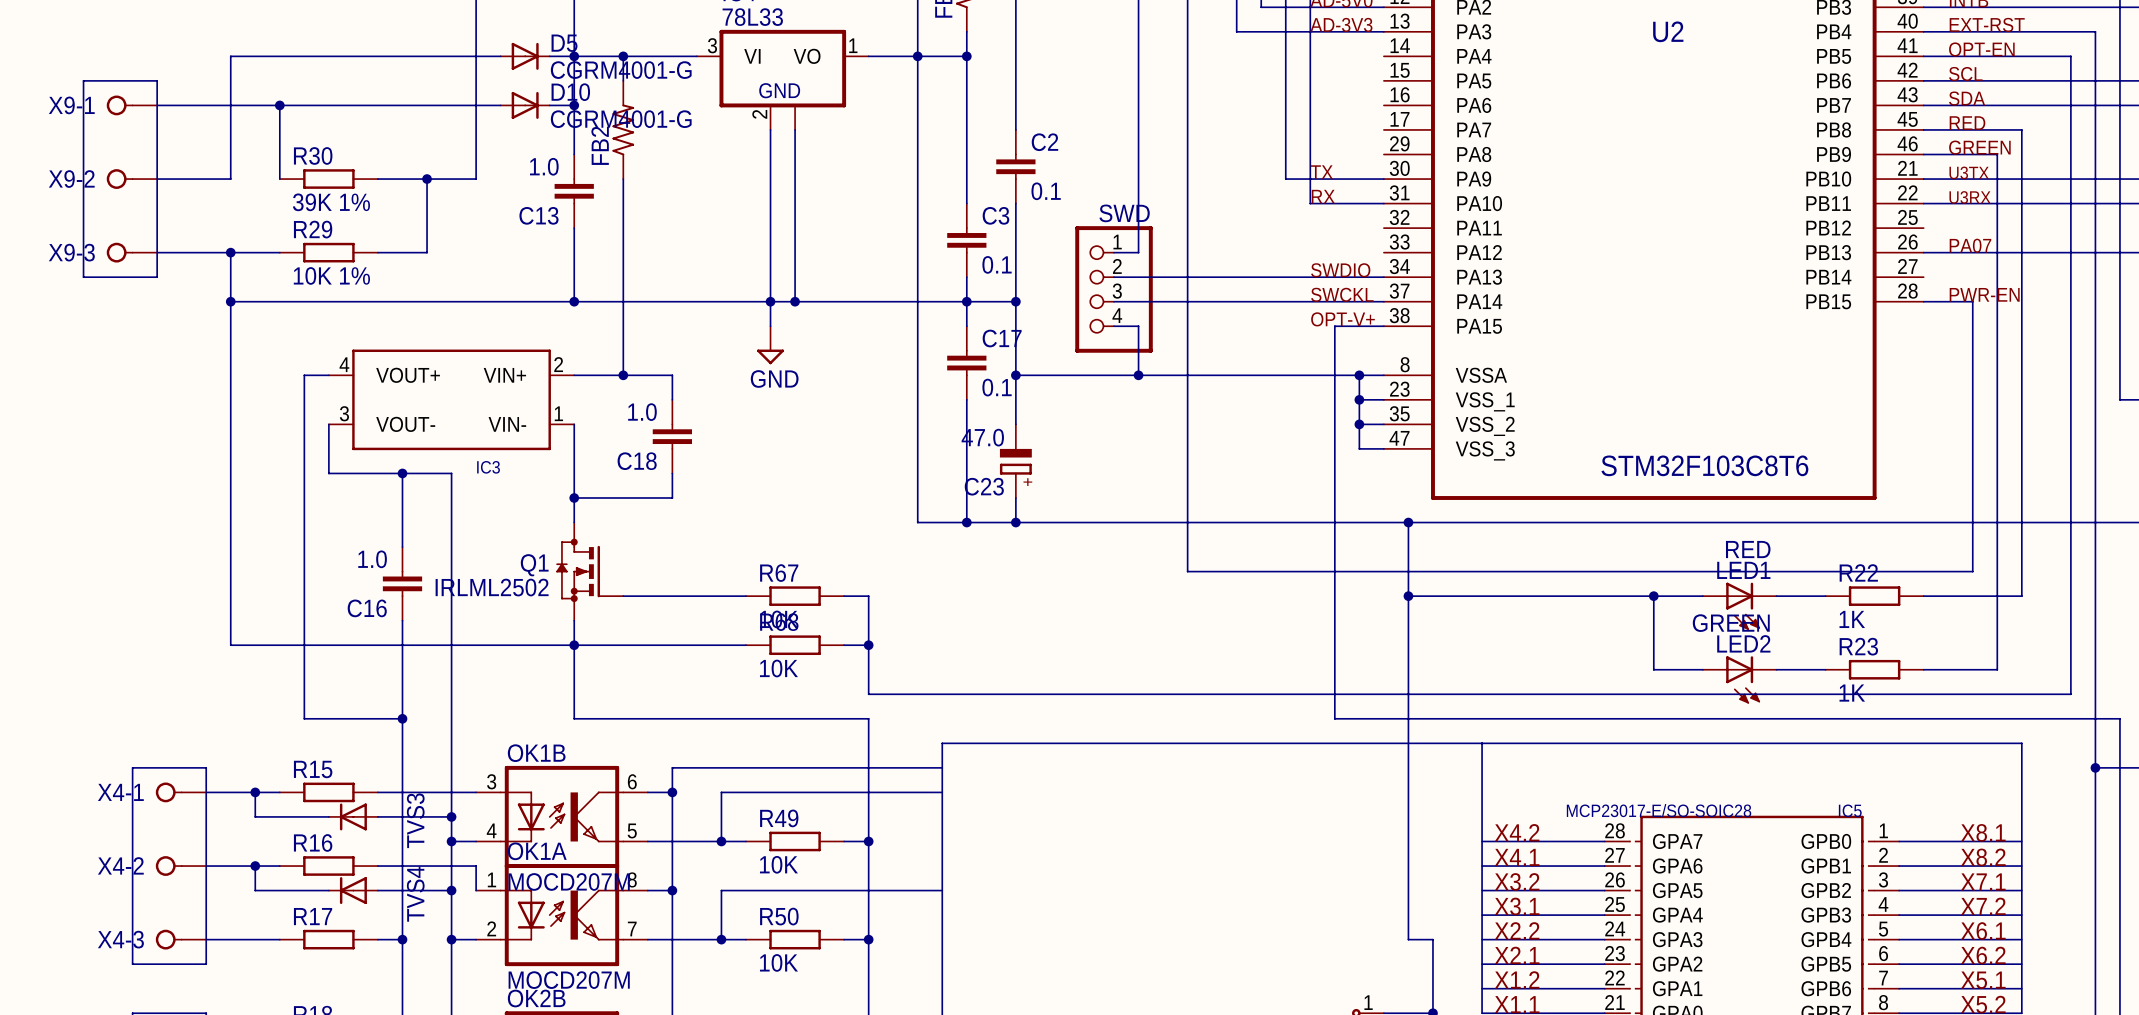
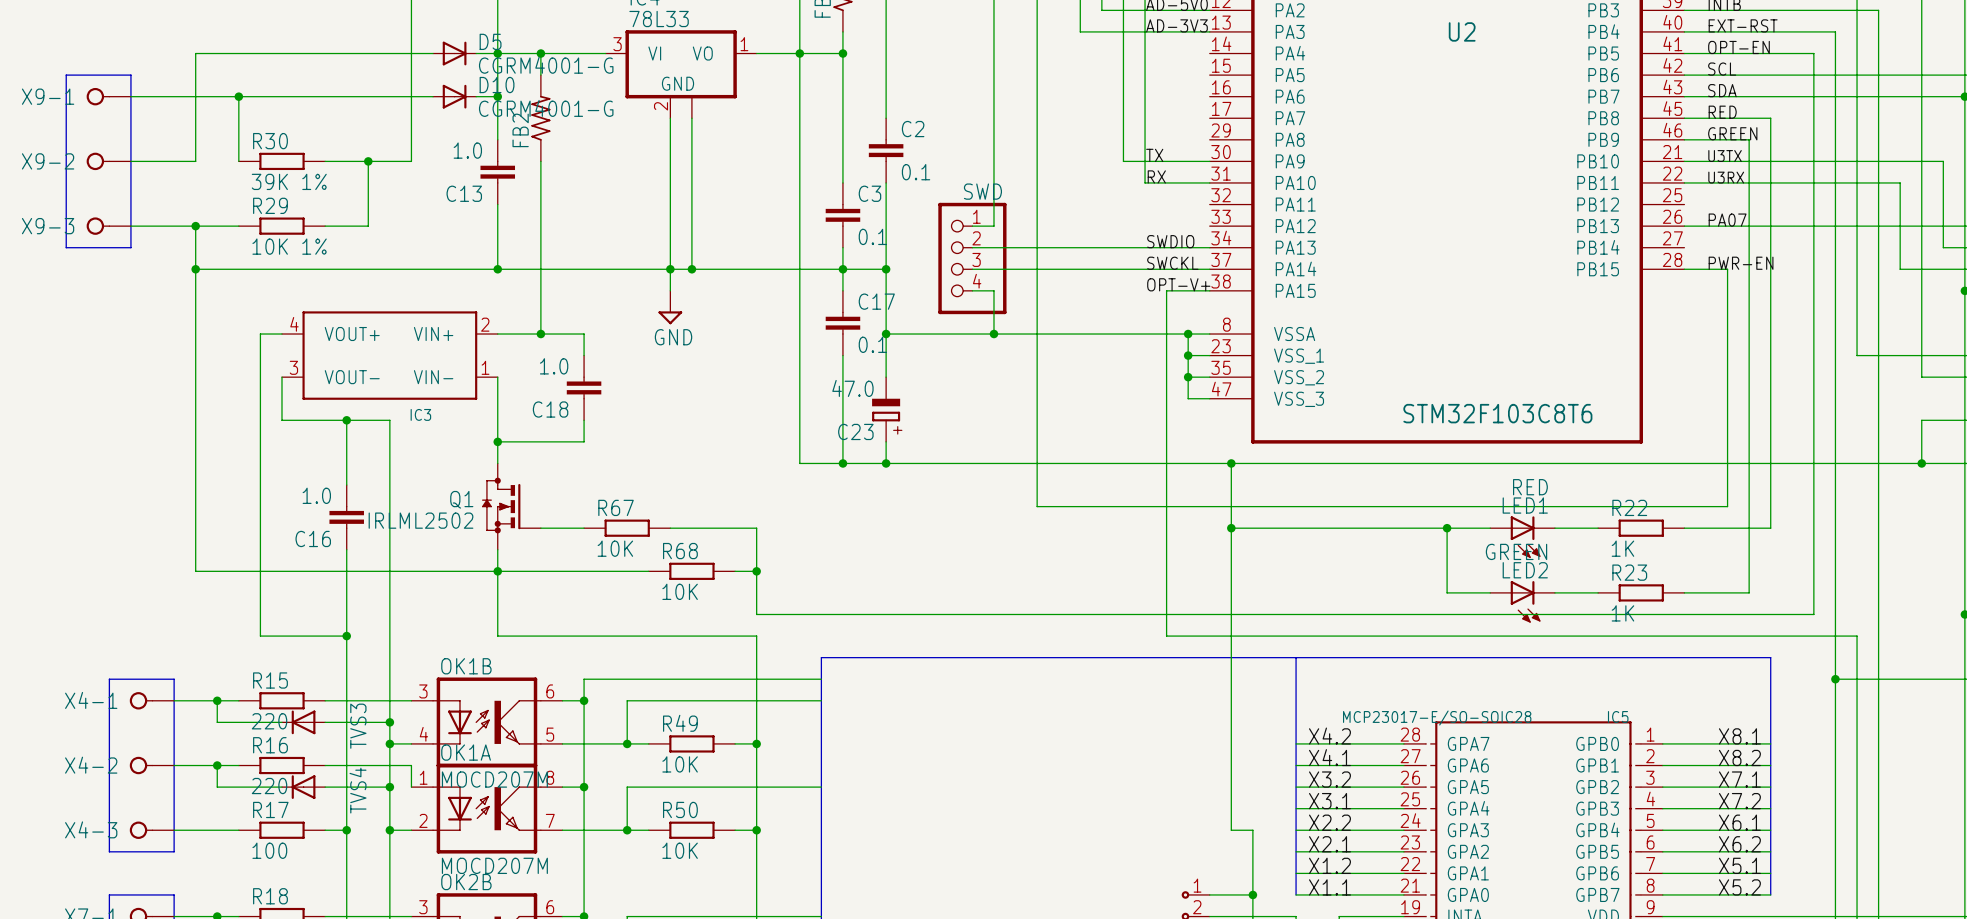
wire: (672, 596) (745, 596) -> (670, 528) (735, 528)
R67 position: (795, 596) -> (627, 528)
R15 value: none -> 220 (269, 721)
R16 value: none -> 220 (269, 786)
R17 value: none -> 100 (269, 850)

